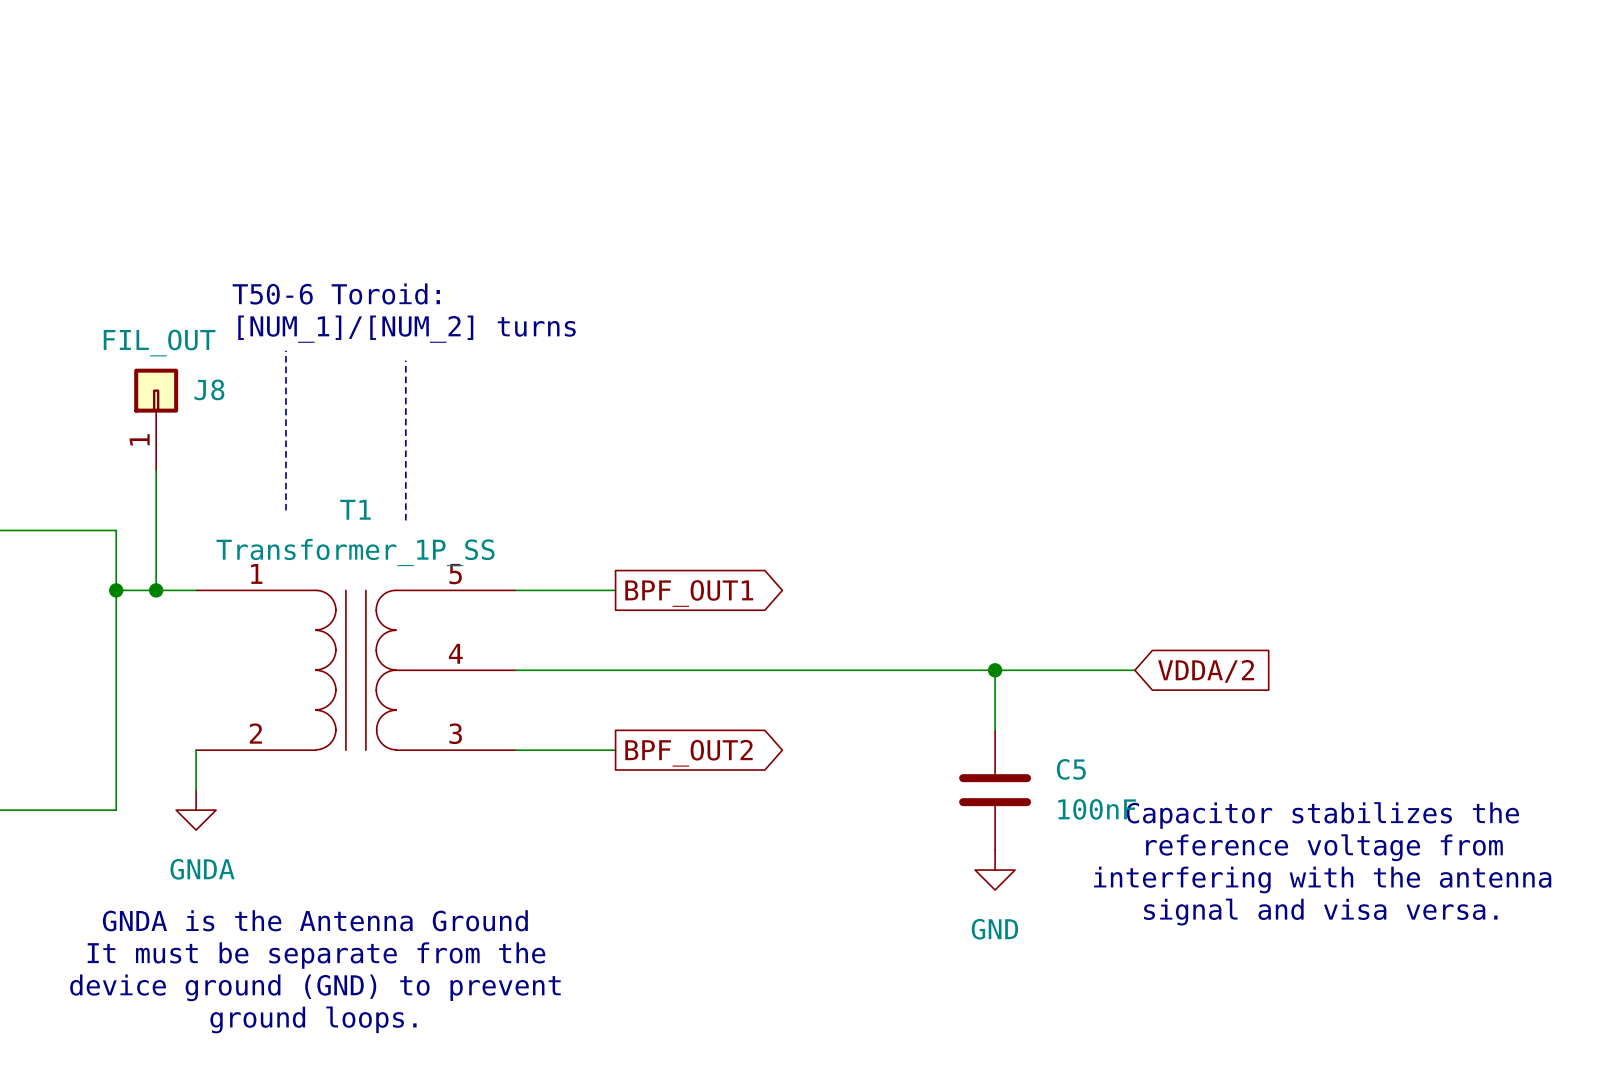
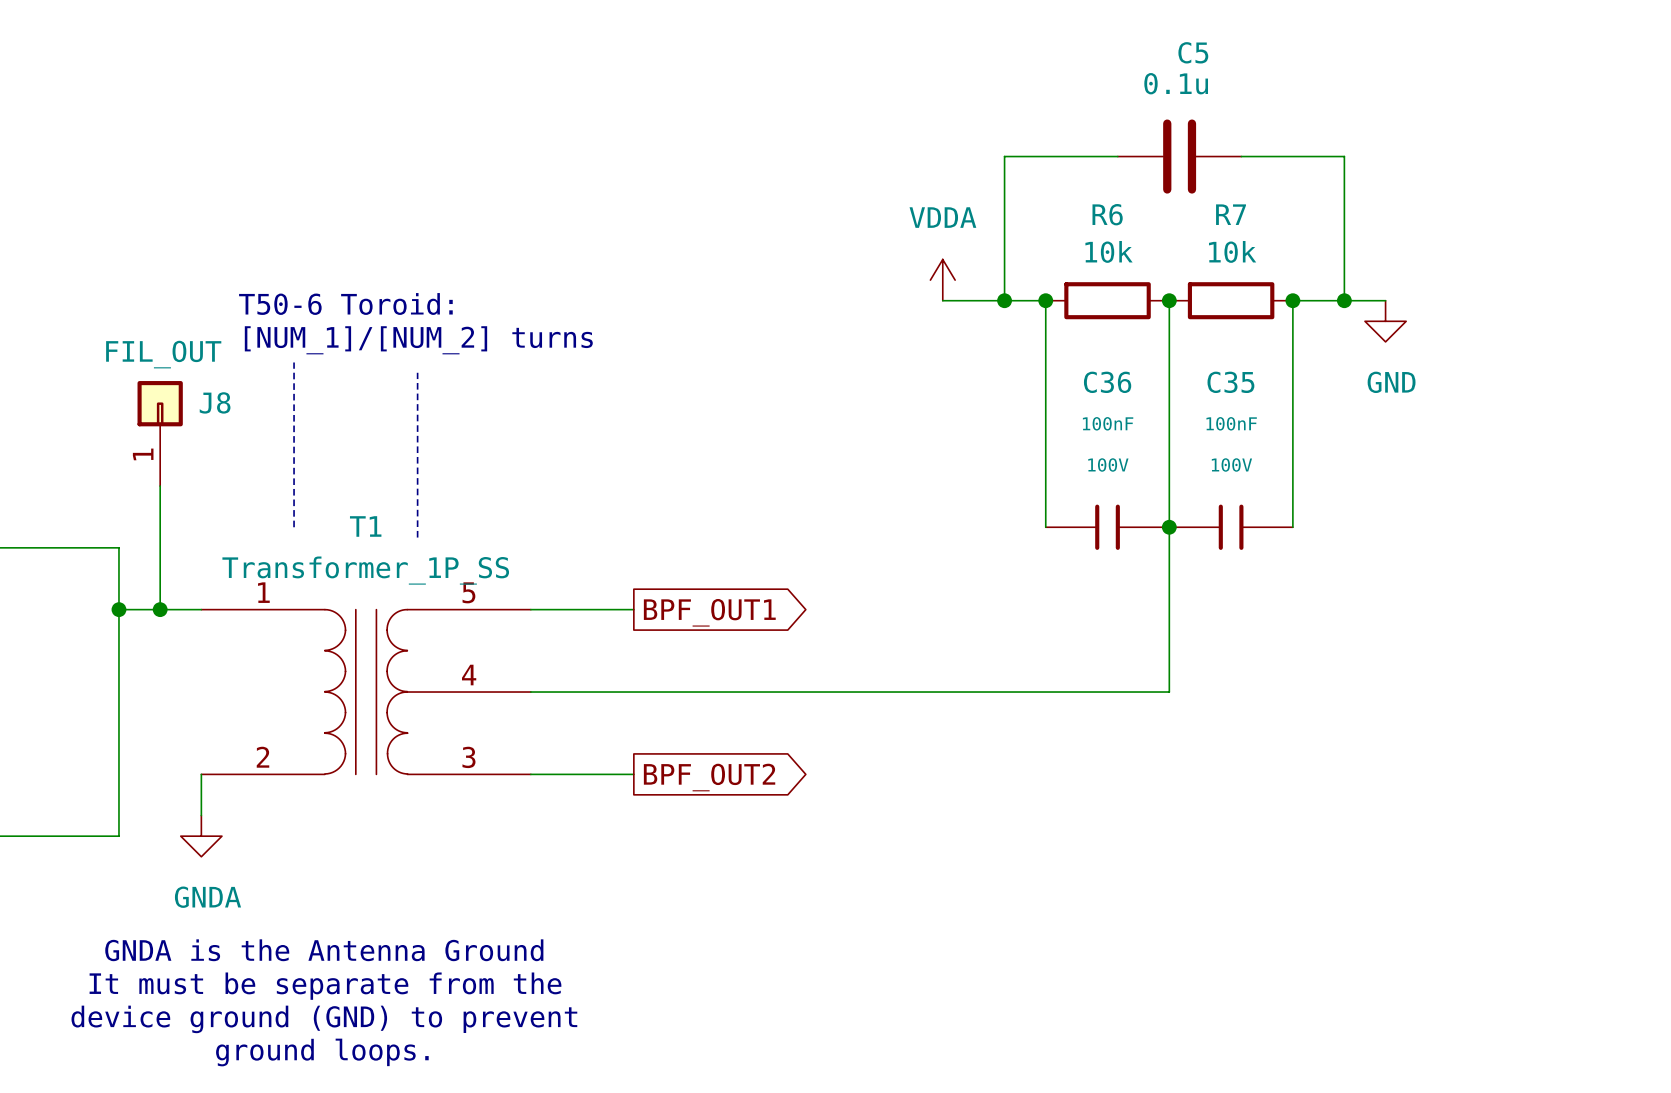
wire: none -> (1117, 156) (1004, 156) (1004, 300)
wire: none -> (1241, 156) (1344, 156) (1344, 300)
power symbol: none -> VDDA (942, 280)
wire: none -> (942, 300) (1045, 300) (1045, 527)
junction: none -> (1004, 300)
junction: none -> (1045, 300)
R6: none -> 10k (1107, 300)
wire: none -> (1169, 300) (1169, 692)
junction: none -> (1169, 300)
R7: none -> 10k (1231, 300)
junction: none -> (1292, 300)
junction: none -> (1344, 300)
wire: none -> (1385, 300) (1292, 300) (1292, 527)
power symbol: none -> GND (1385, 321)
C36: none -> 100nF (1107, 527)
junction: none -> (1169, 527)
C35: none -> 100nF (1231, 527)
wire: (995, 670) (995, 730) -> none
junction: (995, 670) -> none
global label: VDDA/2 (1206, 671) -> none
C5 name position: C5 (1071, 769) -> C5 (1193, 52)
C5 rotation: 0° (995, 790) -> 90° clockwise (1179, 156)
C5 position: (995, 790) -> (1179, 156)
C5 value: 100nF (1097, 809) -> 0.1u (1176, 83)
text: Capacitor stabilizes the (1322, 815) -> none
text: reference voltage from (1324, 847) -> none
power symbol: GND (995, 870) -> none
text: interfering with the antenna (1322, 879) -> none
text: signal and visa versa. (1320, 912) -> none

